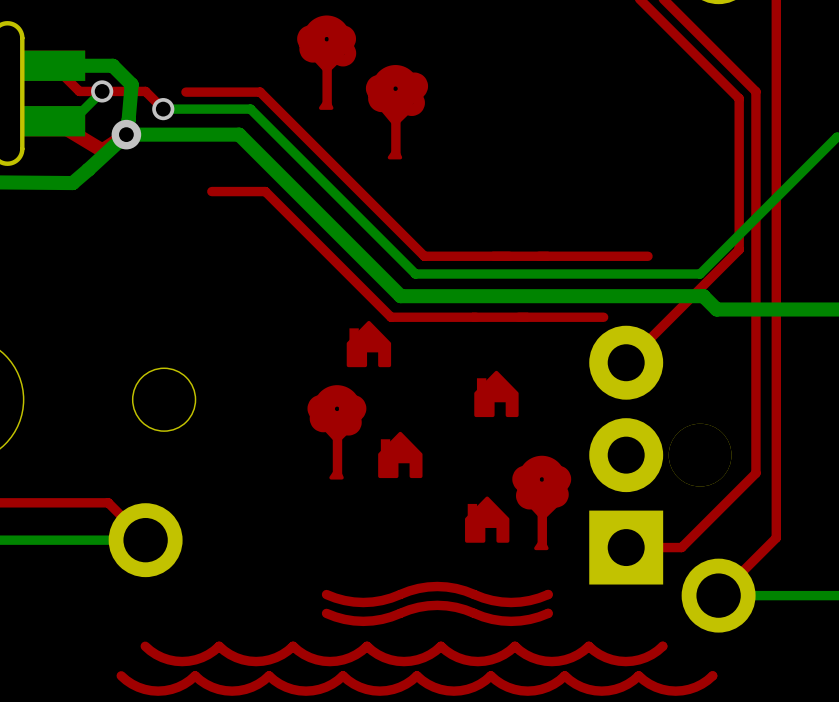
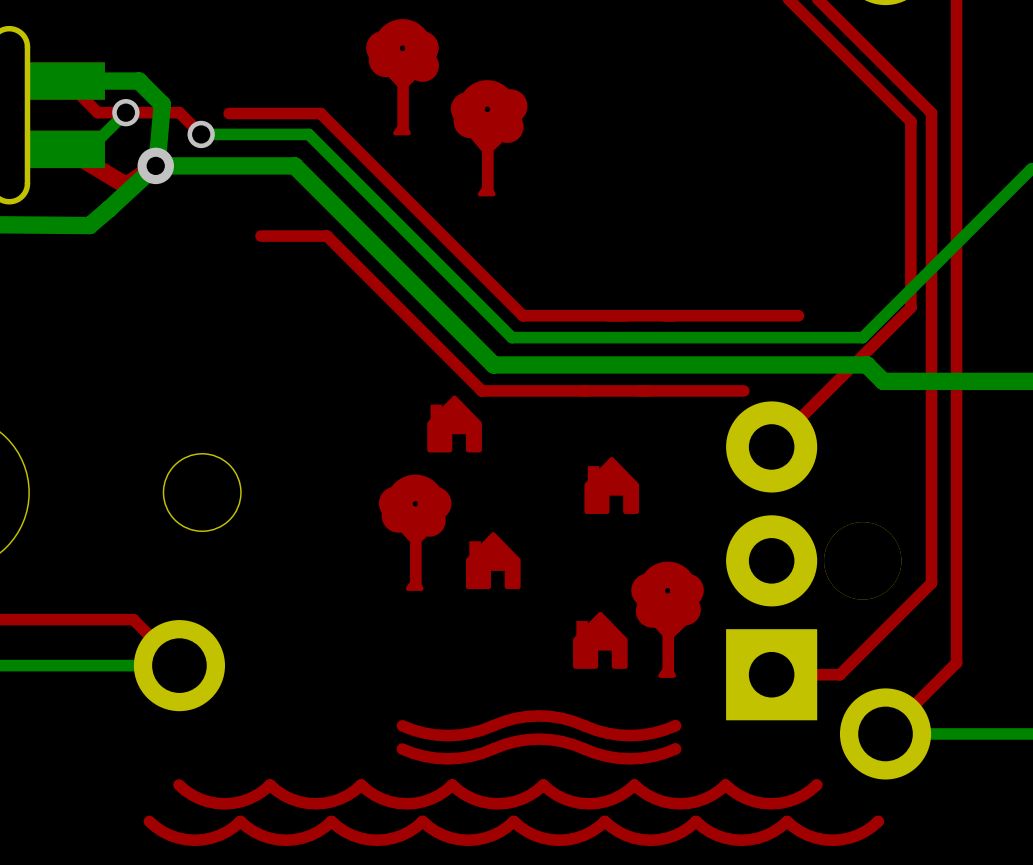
part footprint: [116, 15, 718, 696] -> [143, 19, 885, 847]

